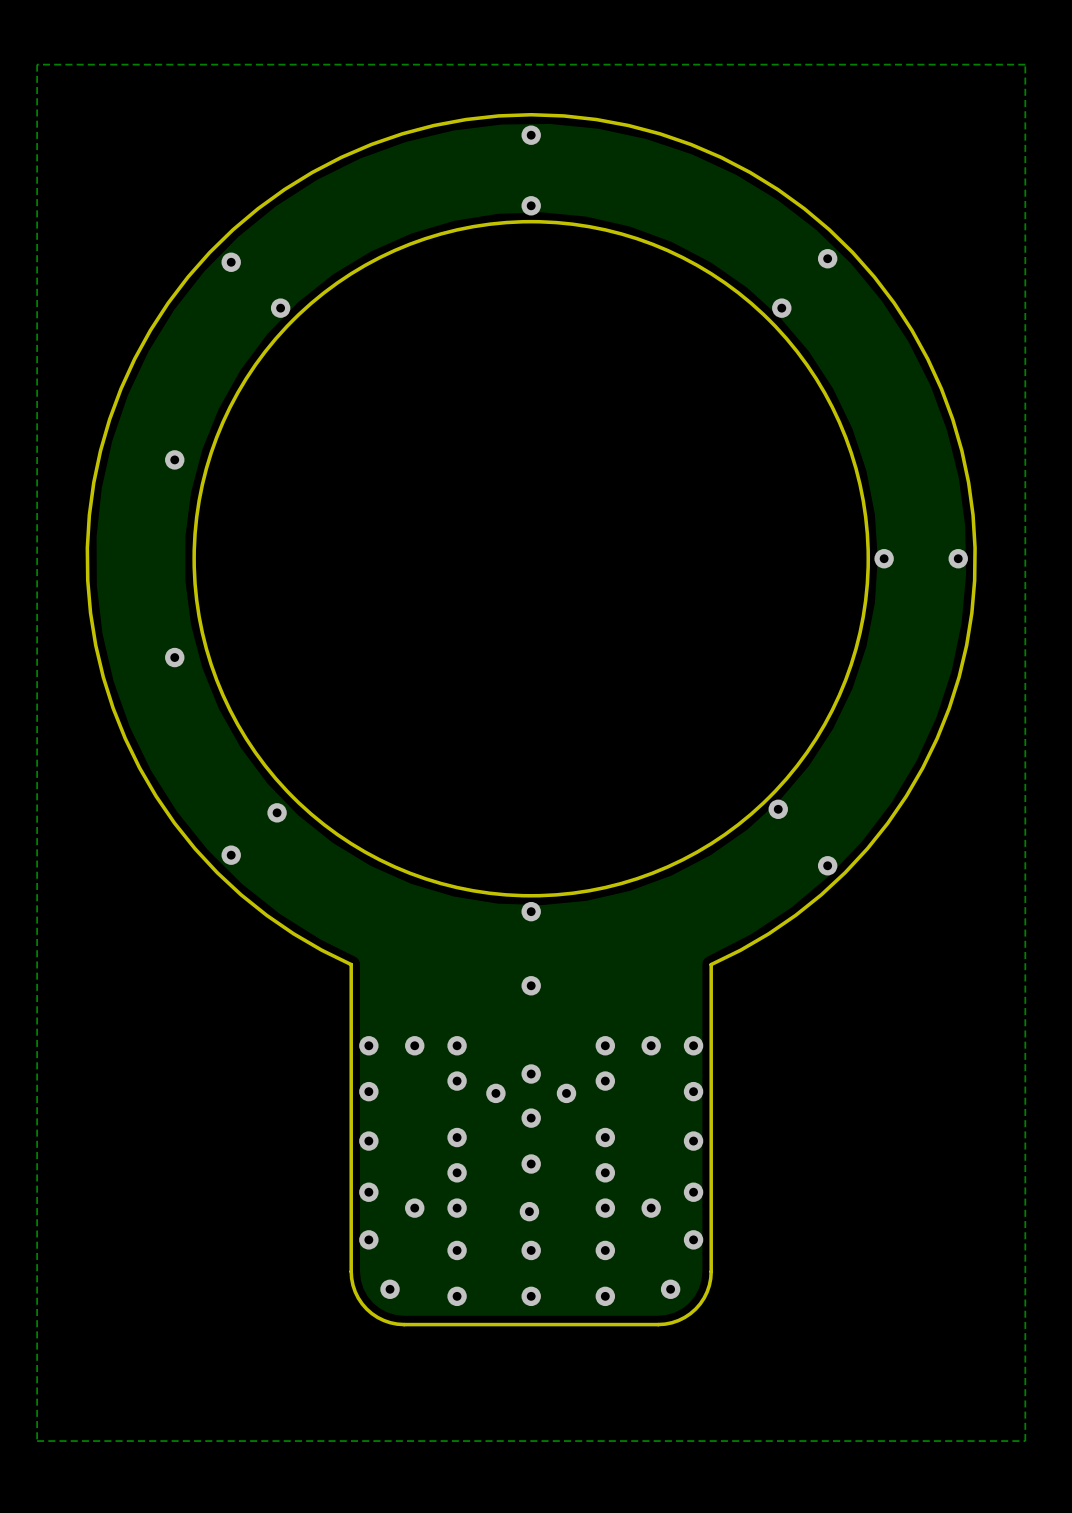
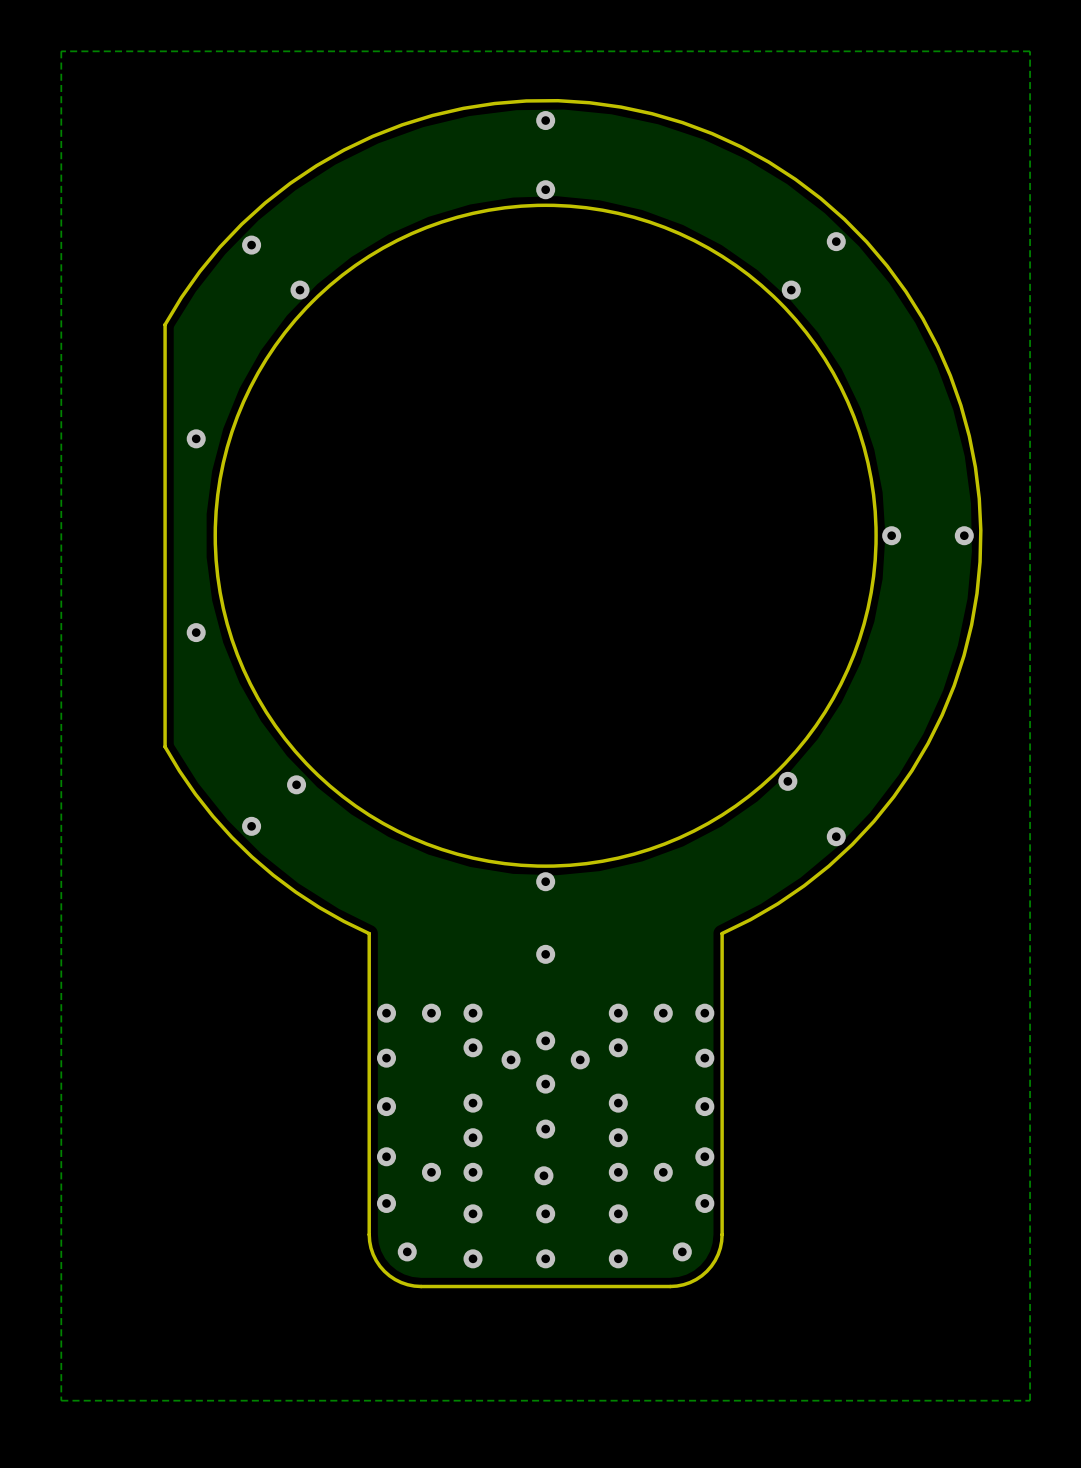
board edge: (711, 964) (740, 950) (795, 915) (845, 872) (887, 823) (922, 767) (937, 738) (959, 677) (971, 613) (975, 547) (968, 482) (952, 419) (941, 388) (912, 330) (894, 303) (852, 252) (804, 208) (777, 189) (721, 157) (660, 133) (596, 119) (531, 114) (466, 119) (402, 133) (341, 157) (312, 172) (258, 208) (209, 252) (168, 303) (150, 330) (121, 388) (100, 450) (93, 482) (87, 547) (90, 613) (103, 677) (125, 738) (156, 796) (174, 823) (217, 872) (241, 894) (293, 933) (351, 964) -> (722, 933) (750, 919) (804, 885) (852, 844) (893, 796) (928, 743) (954, 685) (971, 624) (976, 593) (980, 530) (975, 467) (960, 405) (937, 346) (906, 291) (887, 266) (844, 219) (795, 179) (768, 162) (712, 133) (652, 113) (589, 102) (558, 100) (494, 103) (432, 115) (372, 136) (344, 150) (290, 183) (241, 224) (199, 271) (165, 324) (165, 746) (195, 794) (212, 816) (251, 856) (273, 875) (319, 907) (369, 933)

